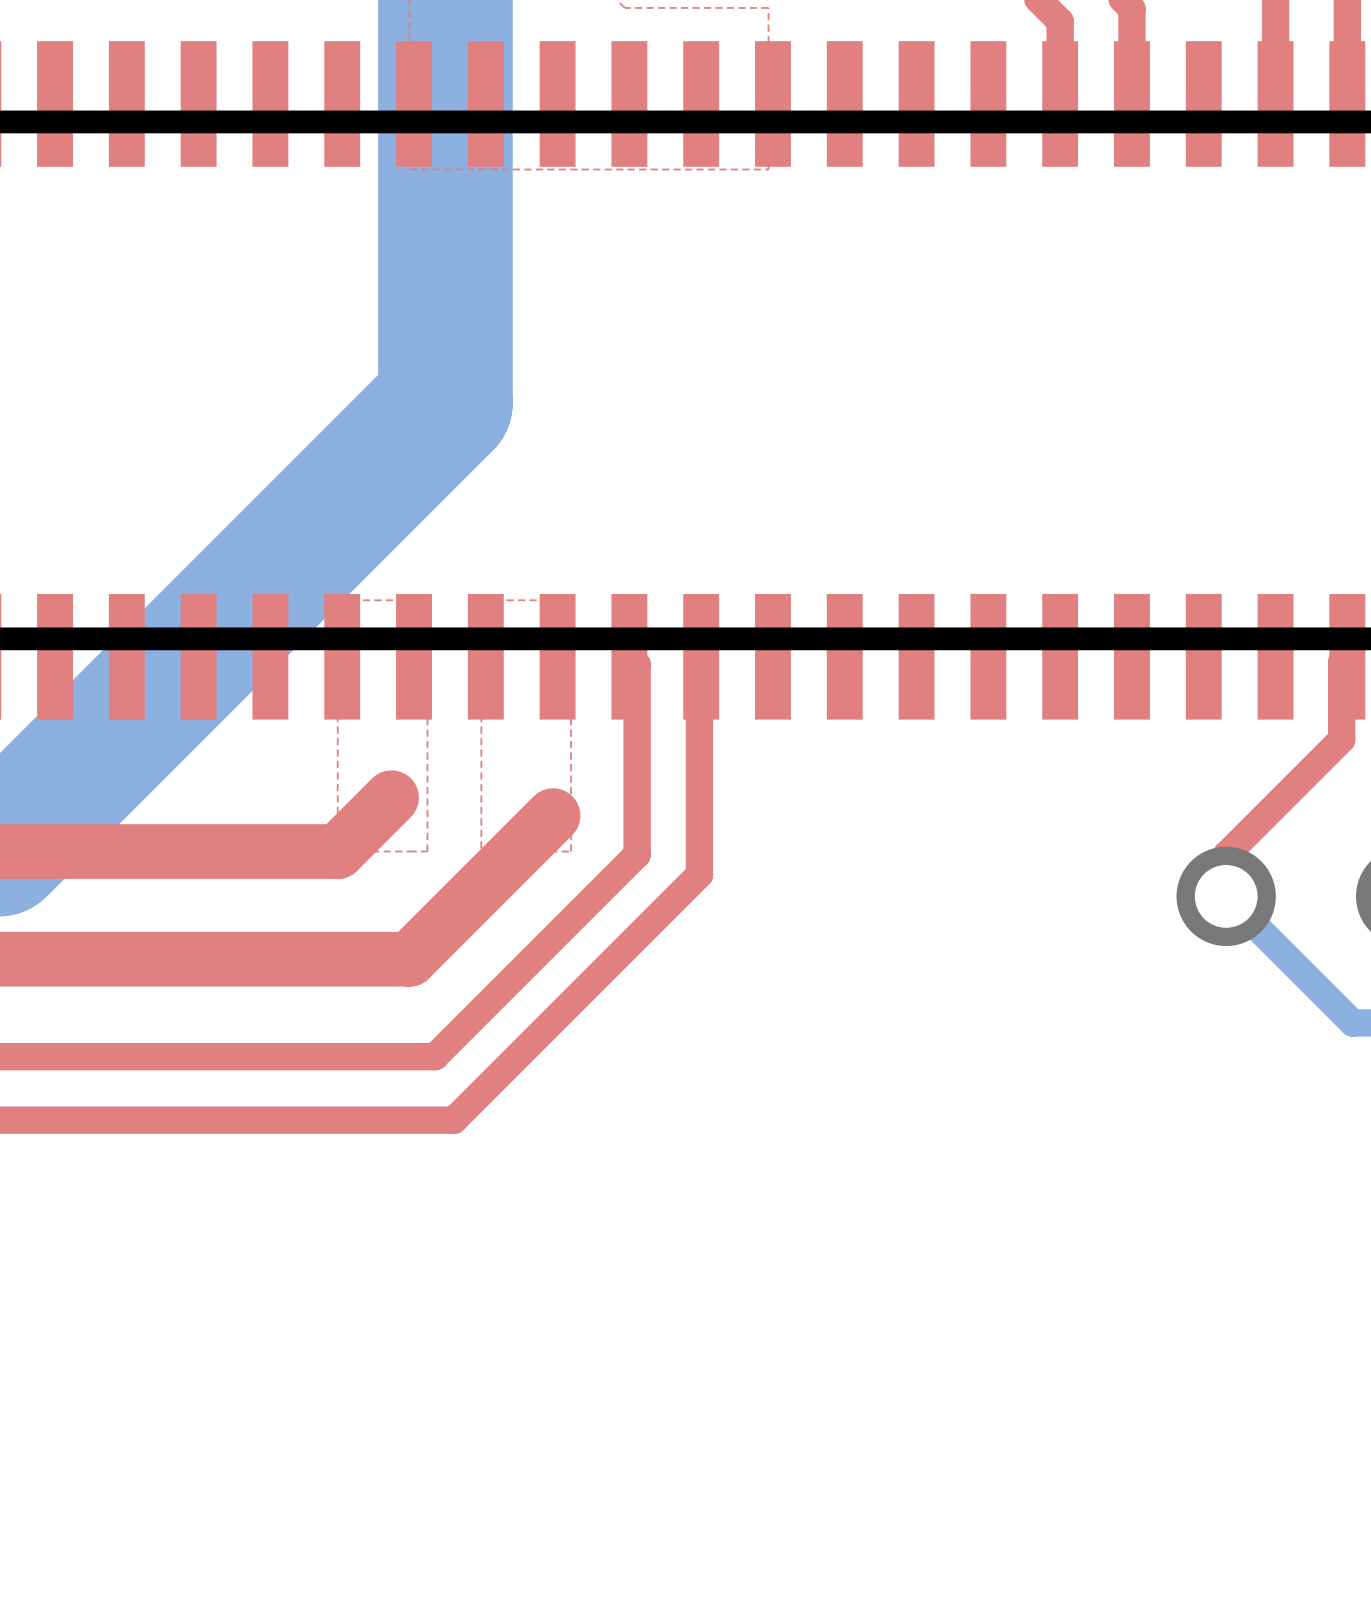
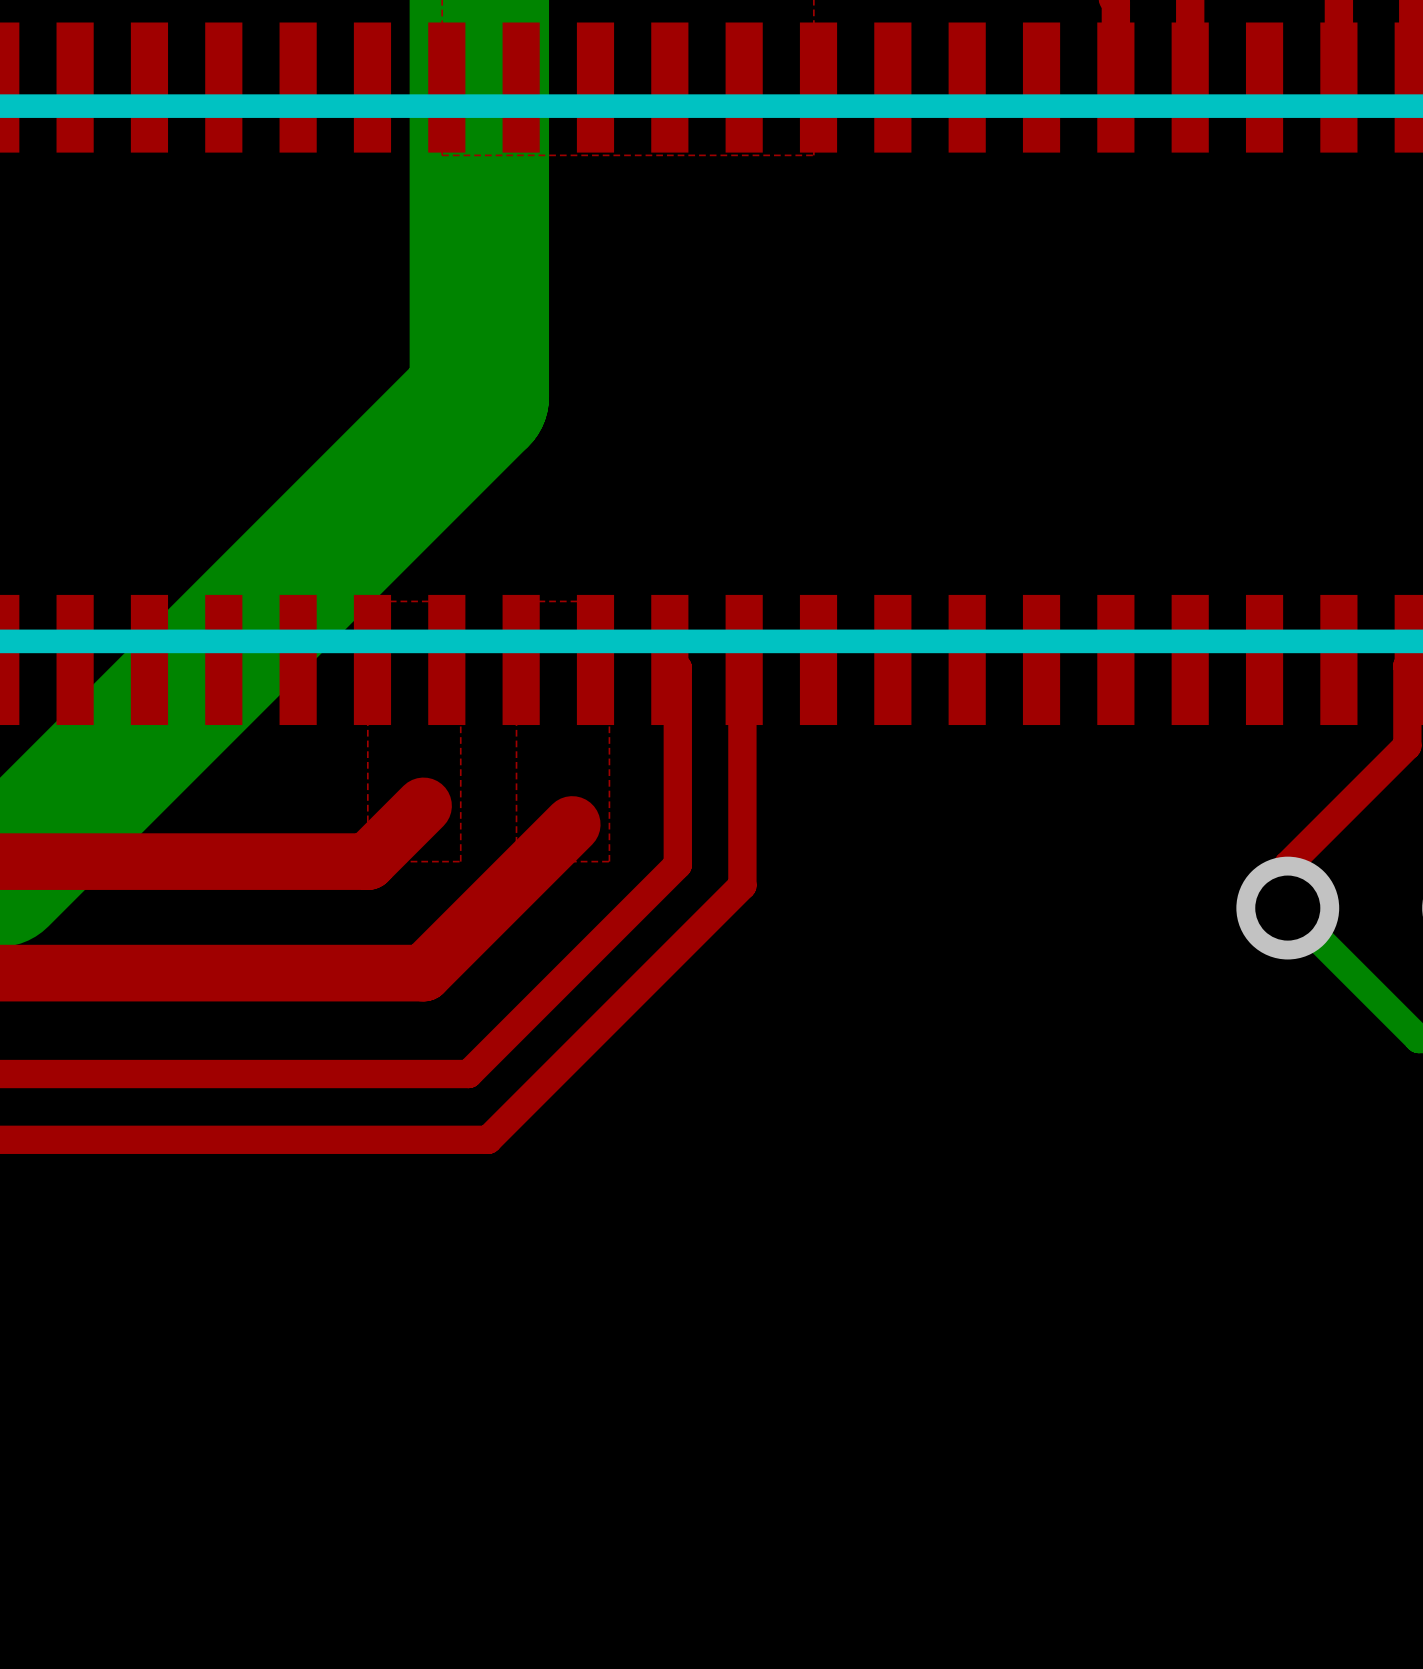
top track: (553, 815) (409, 959) (391, 959) -> (572, 824) (423, 973)

